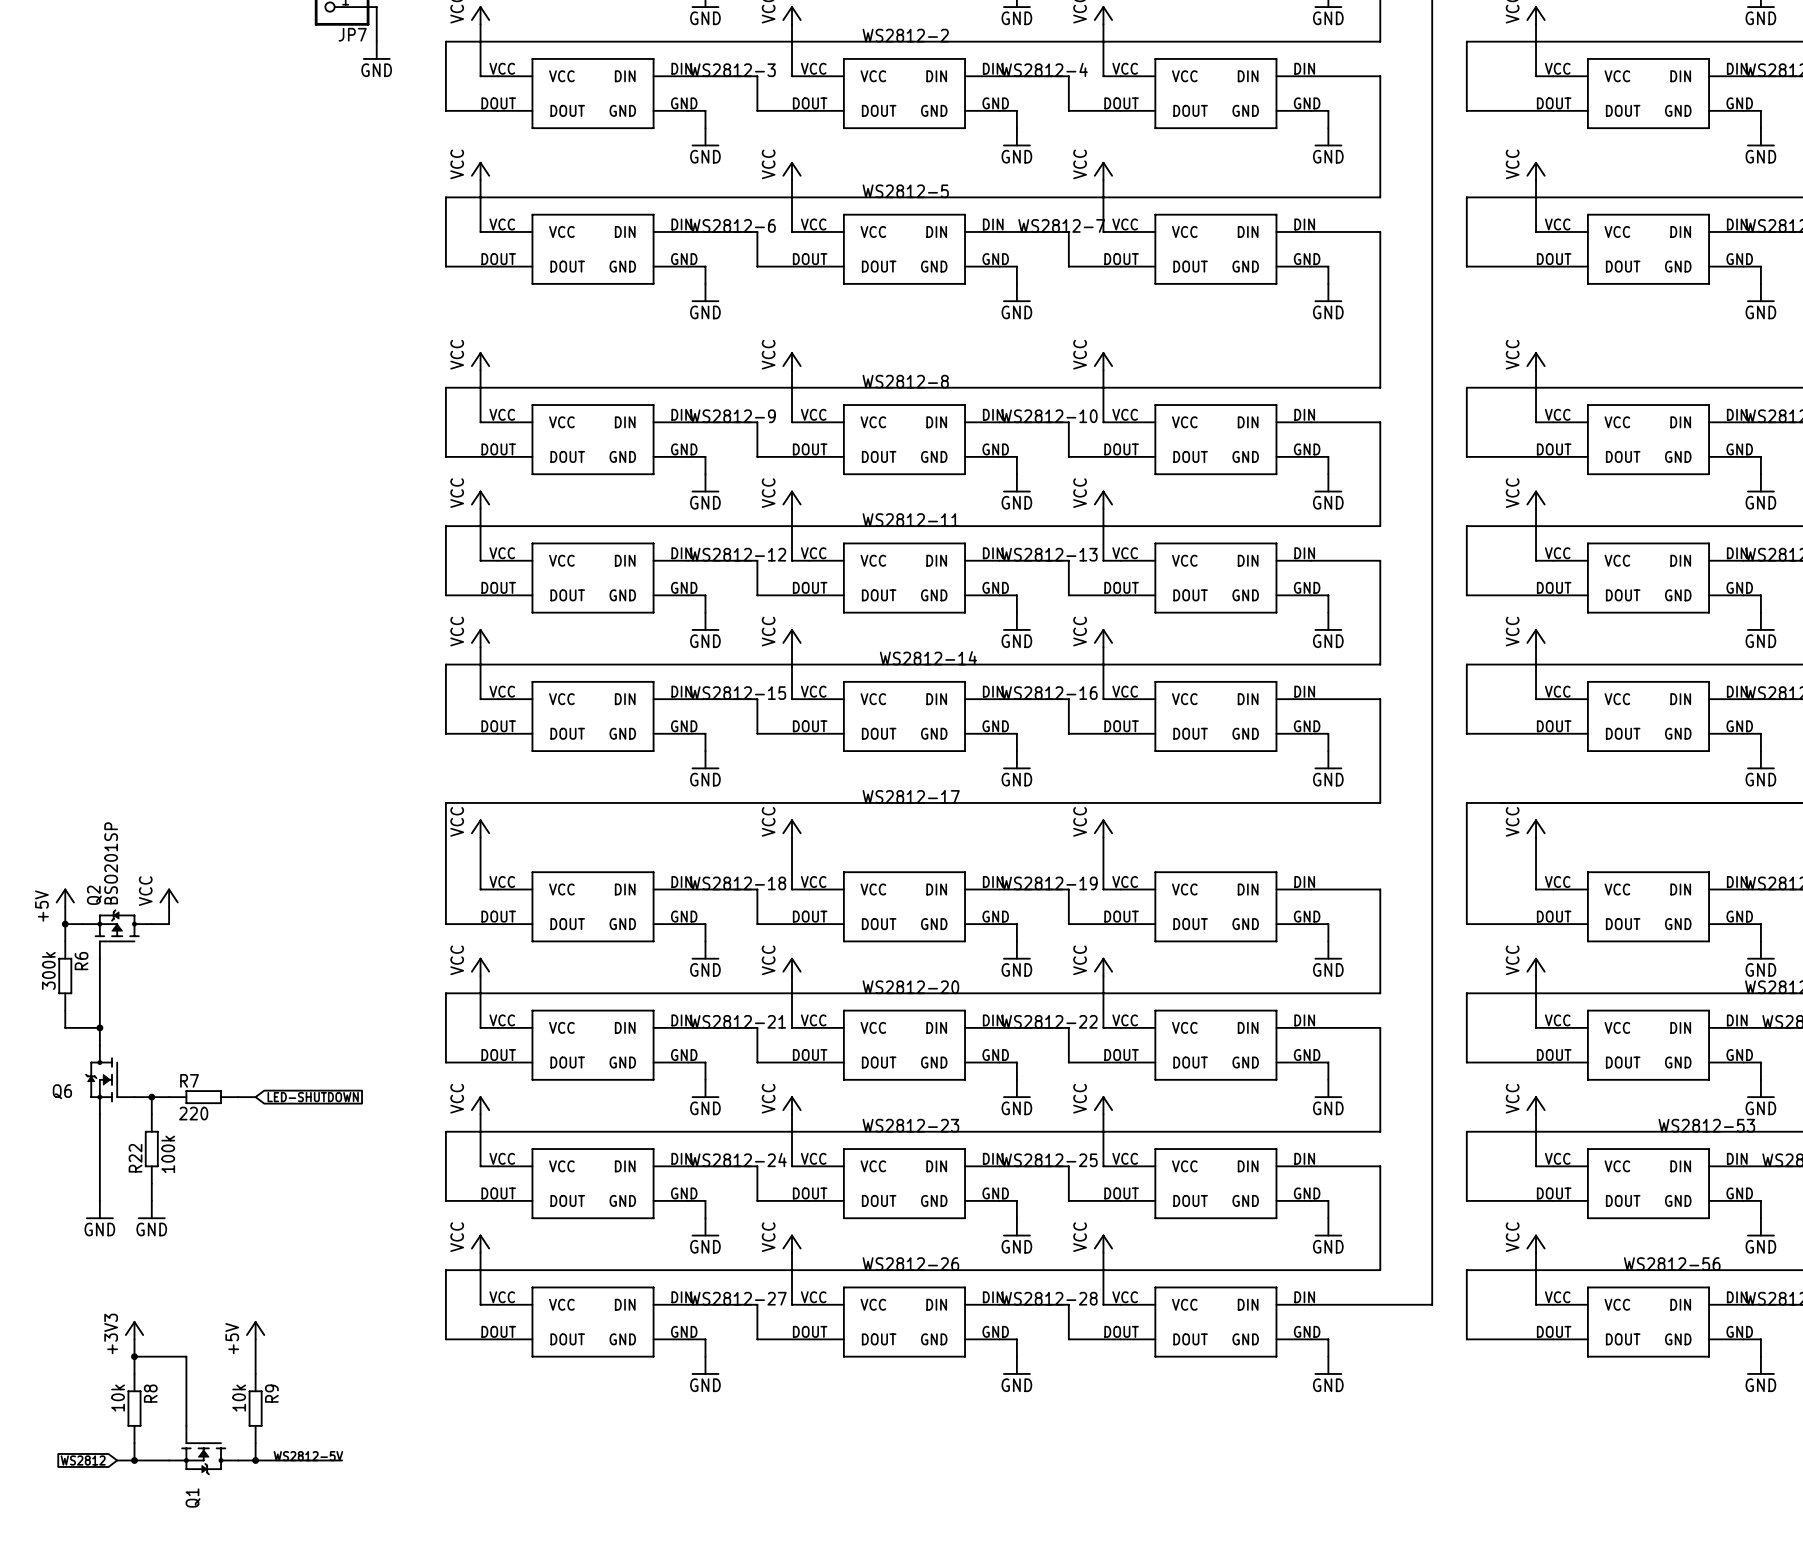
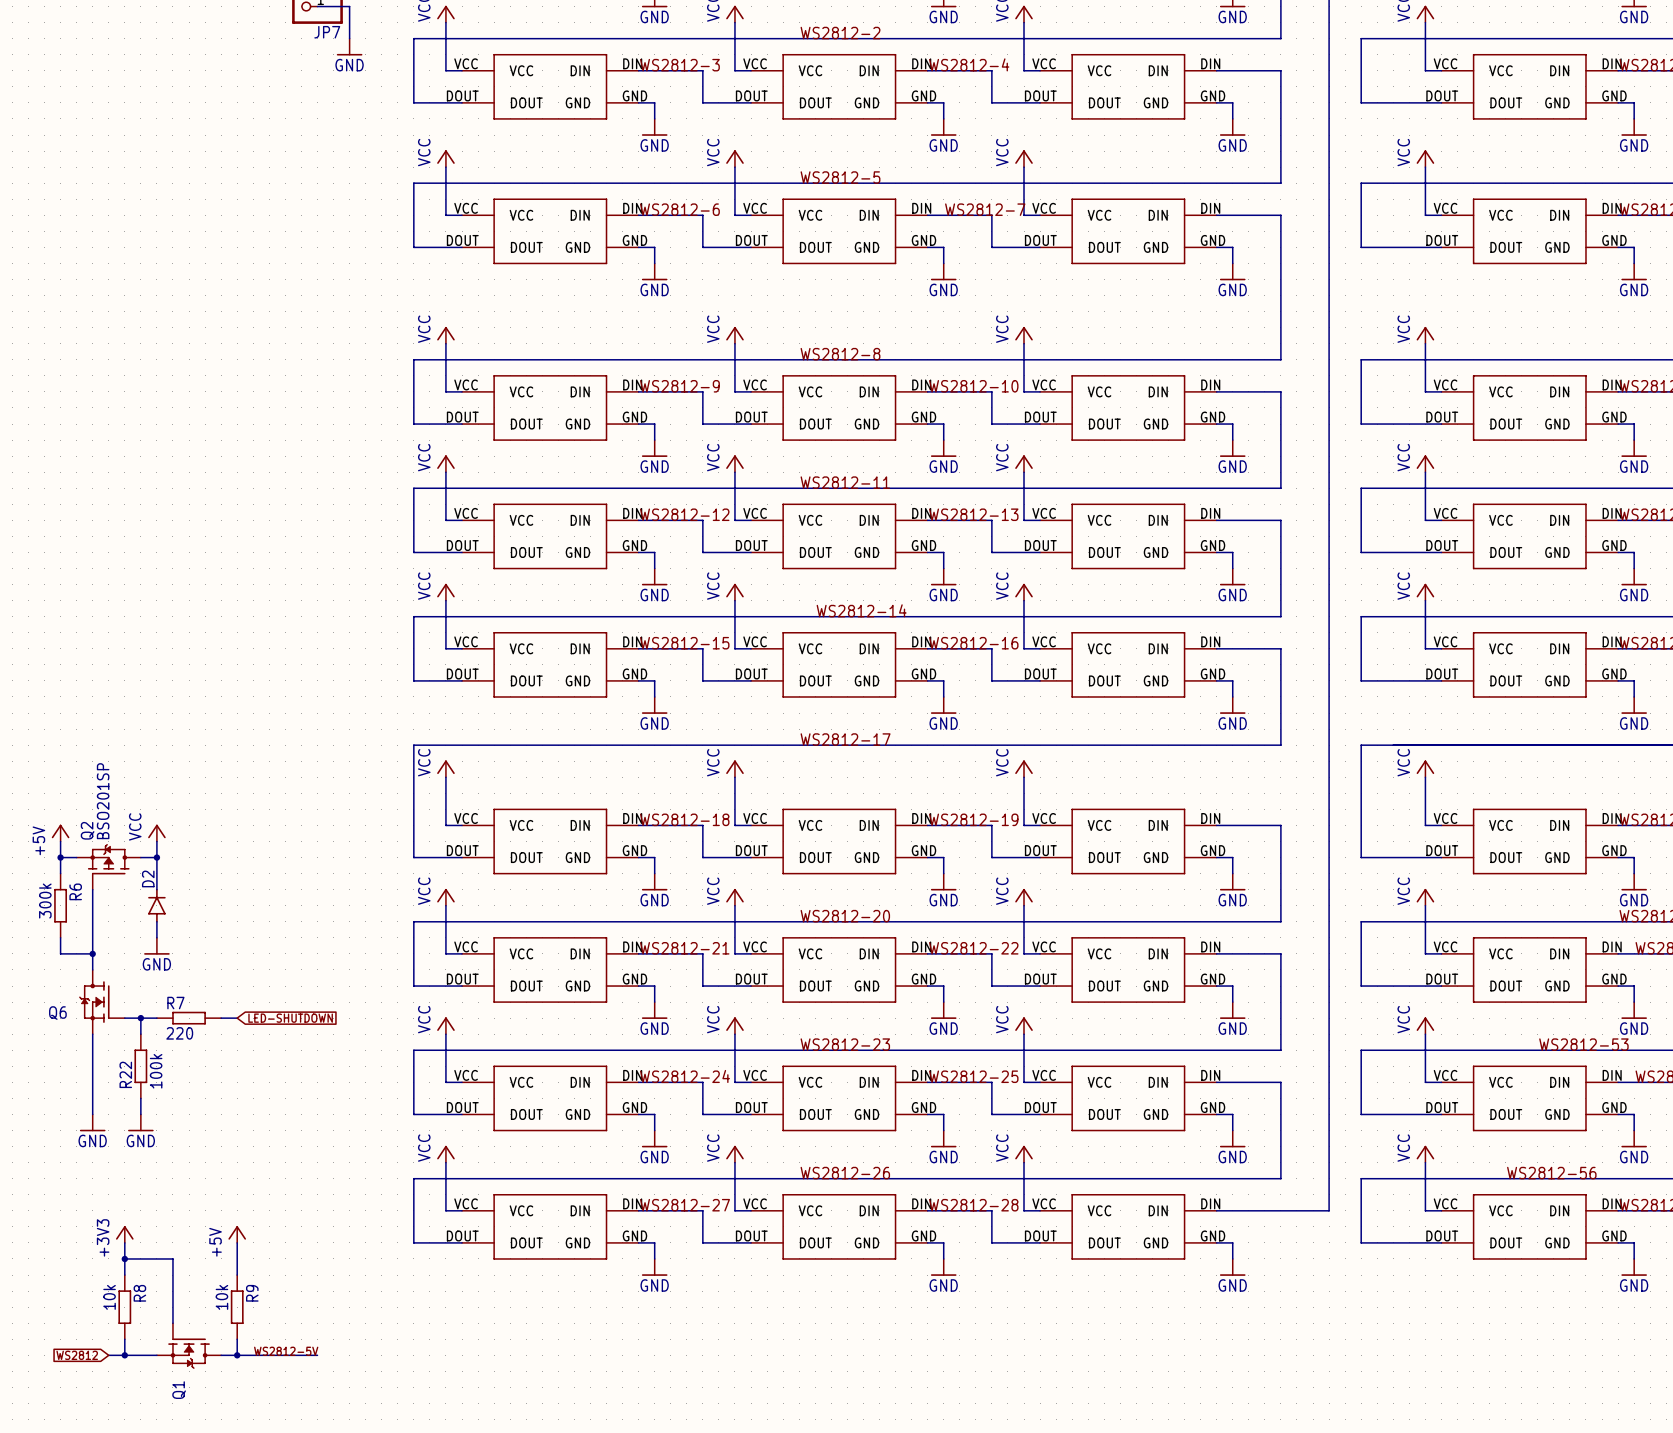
wire: none -> (156, 857) (156, 889)
junction: none -> (156, 857)
D2: none -> (156, 905)
wire: none -> (156, 921) (156, 937)
power symbol: none -> GND (156, 946)

